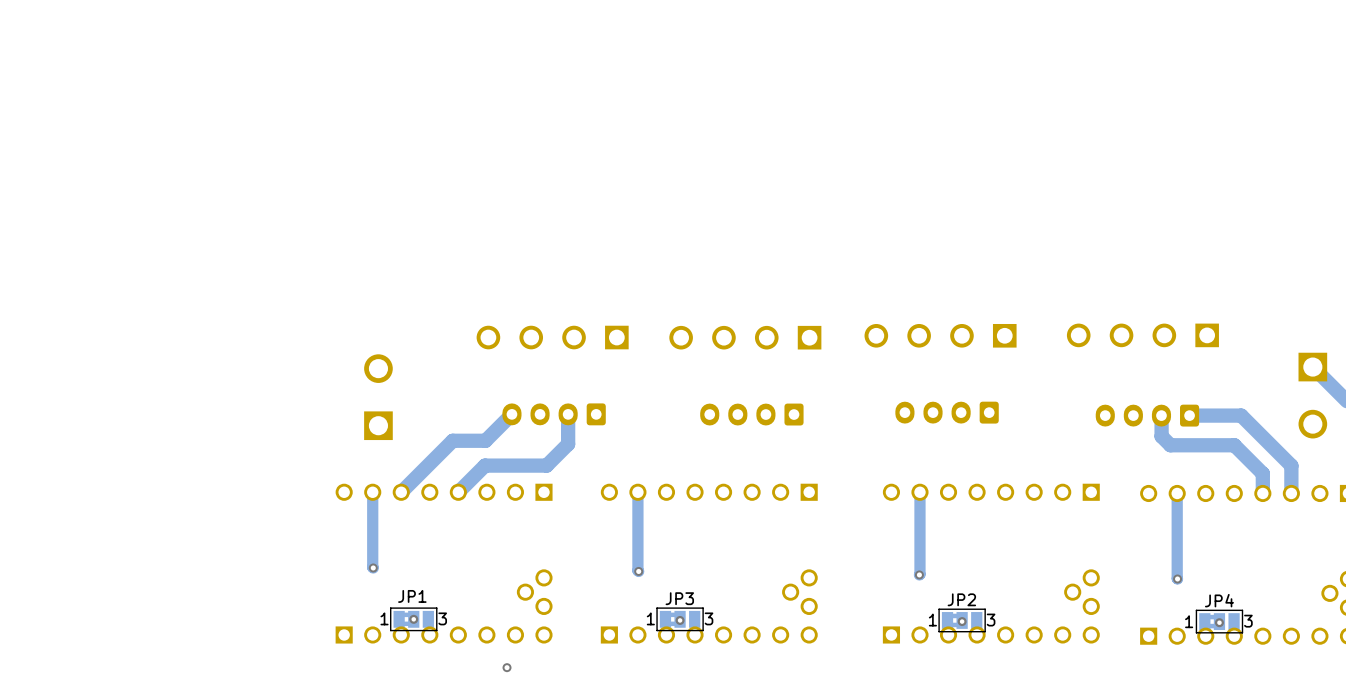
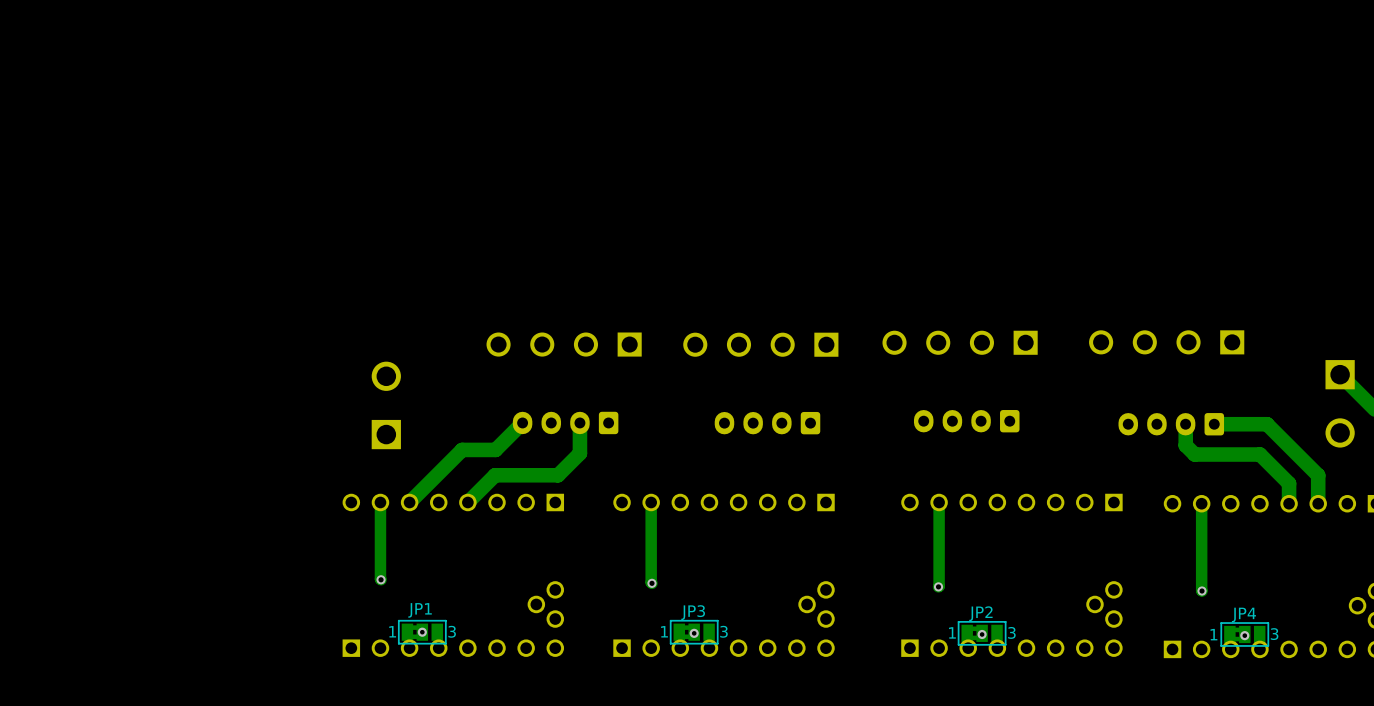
via: (507, 667) -> none

